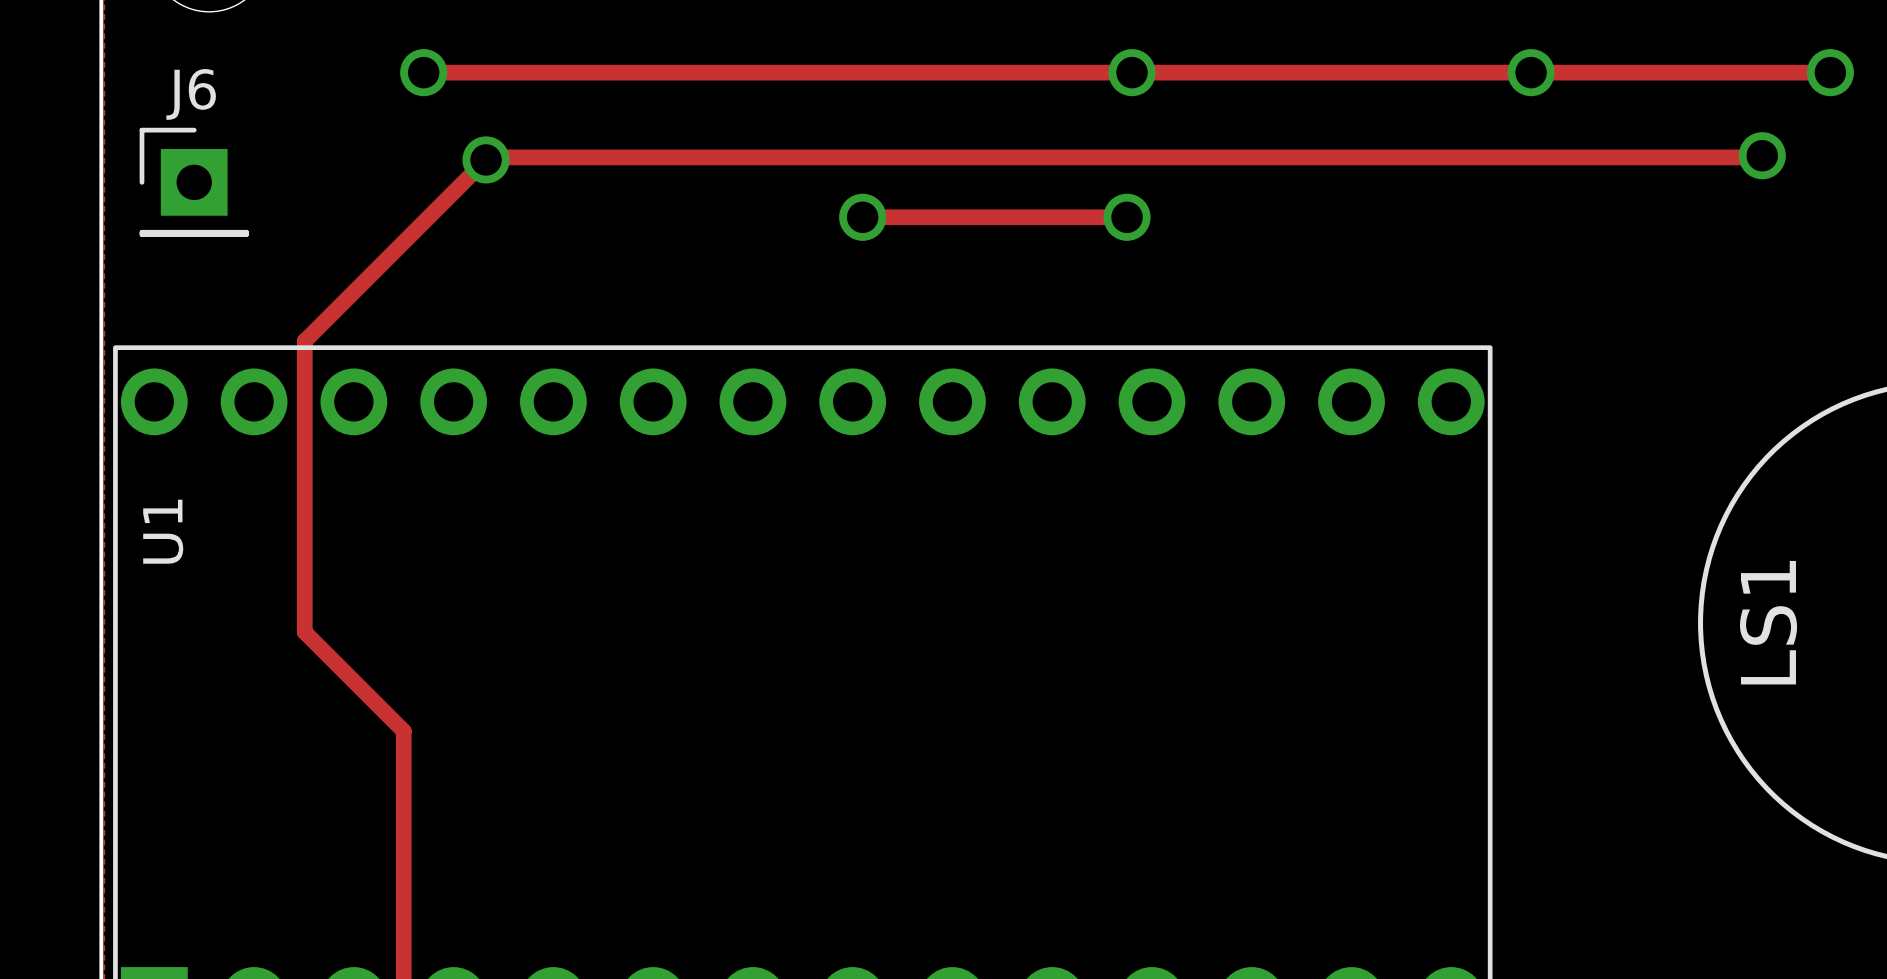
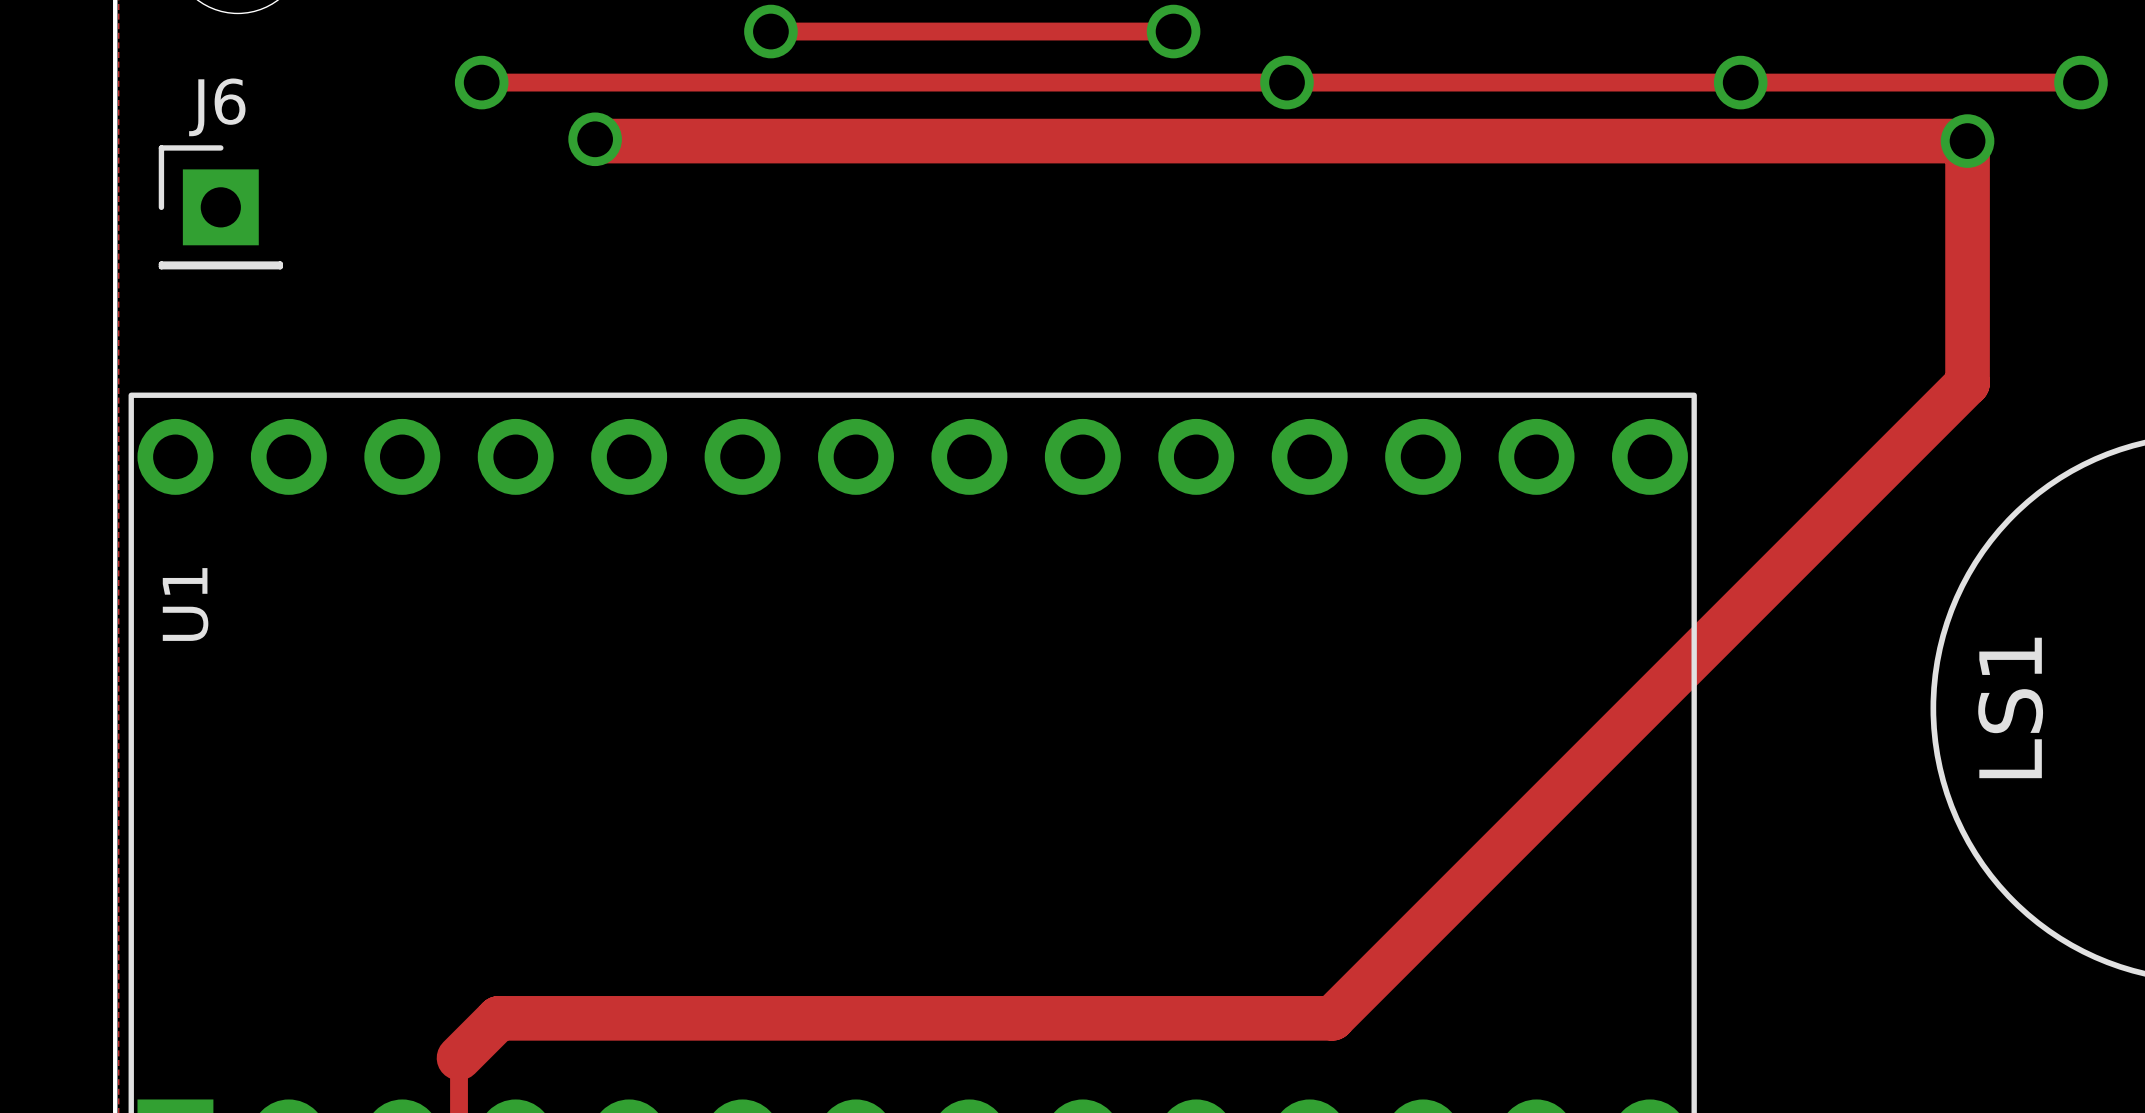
track: none -> (770, 31) (1173, 31)
via: none -> (770, 31)
via: none -> (1173, 31)
track: (1762, 155) (1760, 157) (488, 157) (304, 341) (304, 632) (403, 731) (403, 930) -> (595, 139) (596, 141) (1967, 141) (1967, 383) (1332, 1018) (498, 1018) (459, 1058)
via position: (1762, 155) -> (1967, 141)
via position: (486, 159) -> (595, 139)
track: (862, 217) (1127, 217) -> none
via: (862, 217) -> none
via: (1127, 217) -> none

